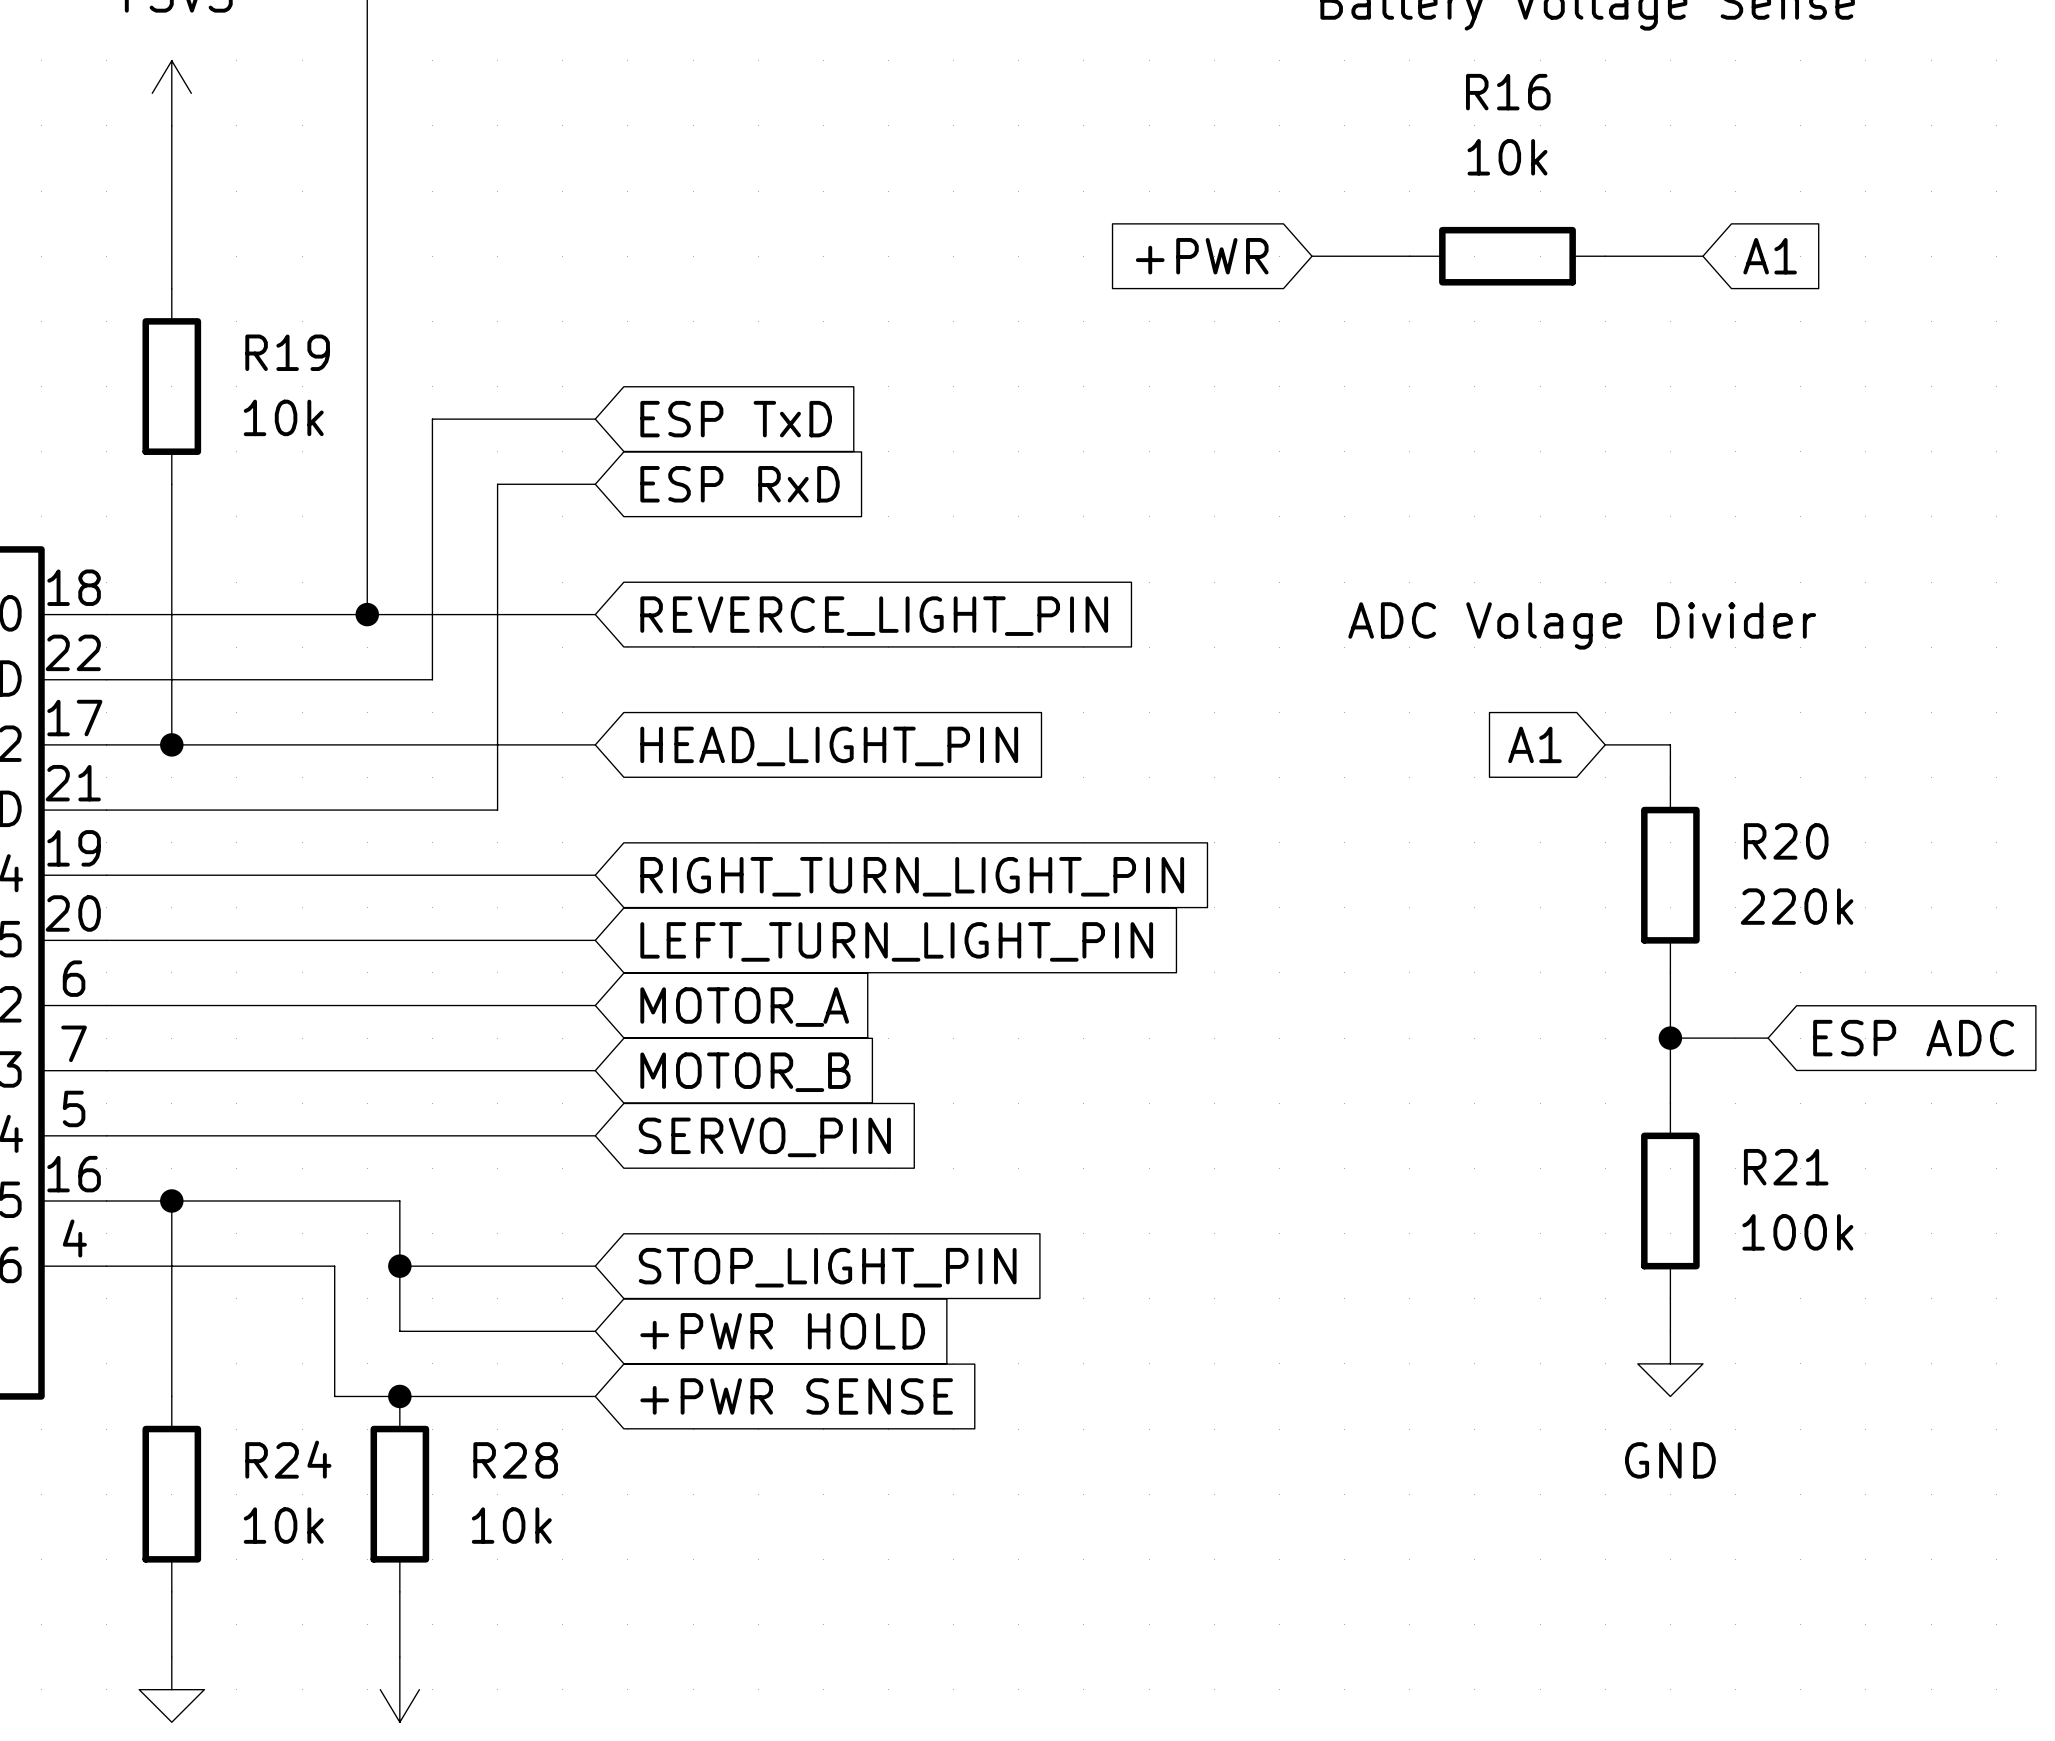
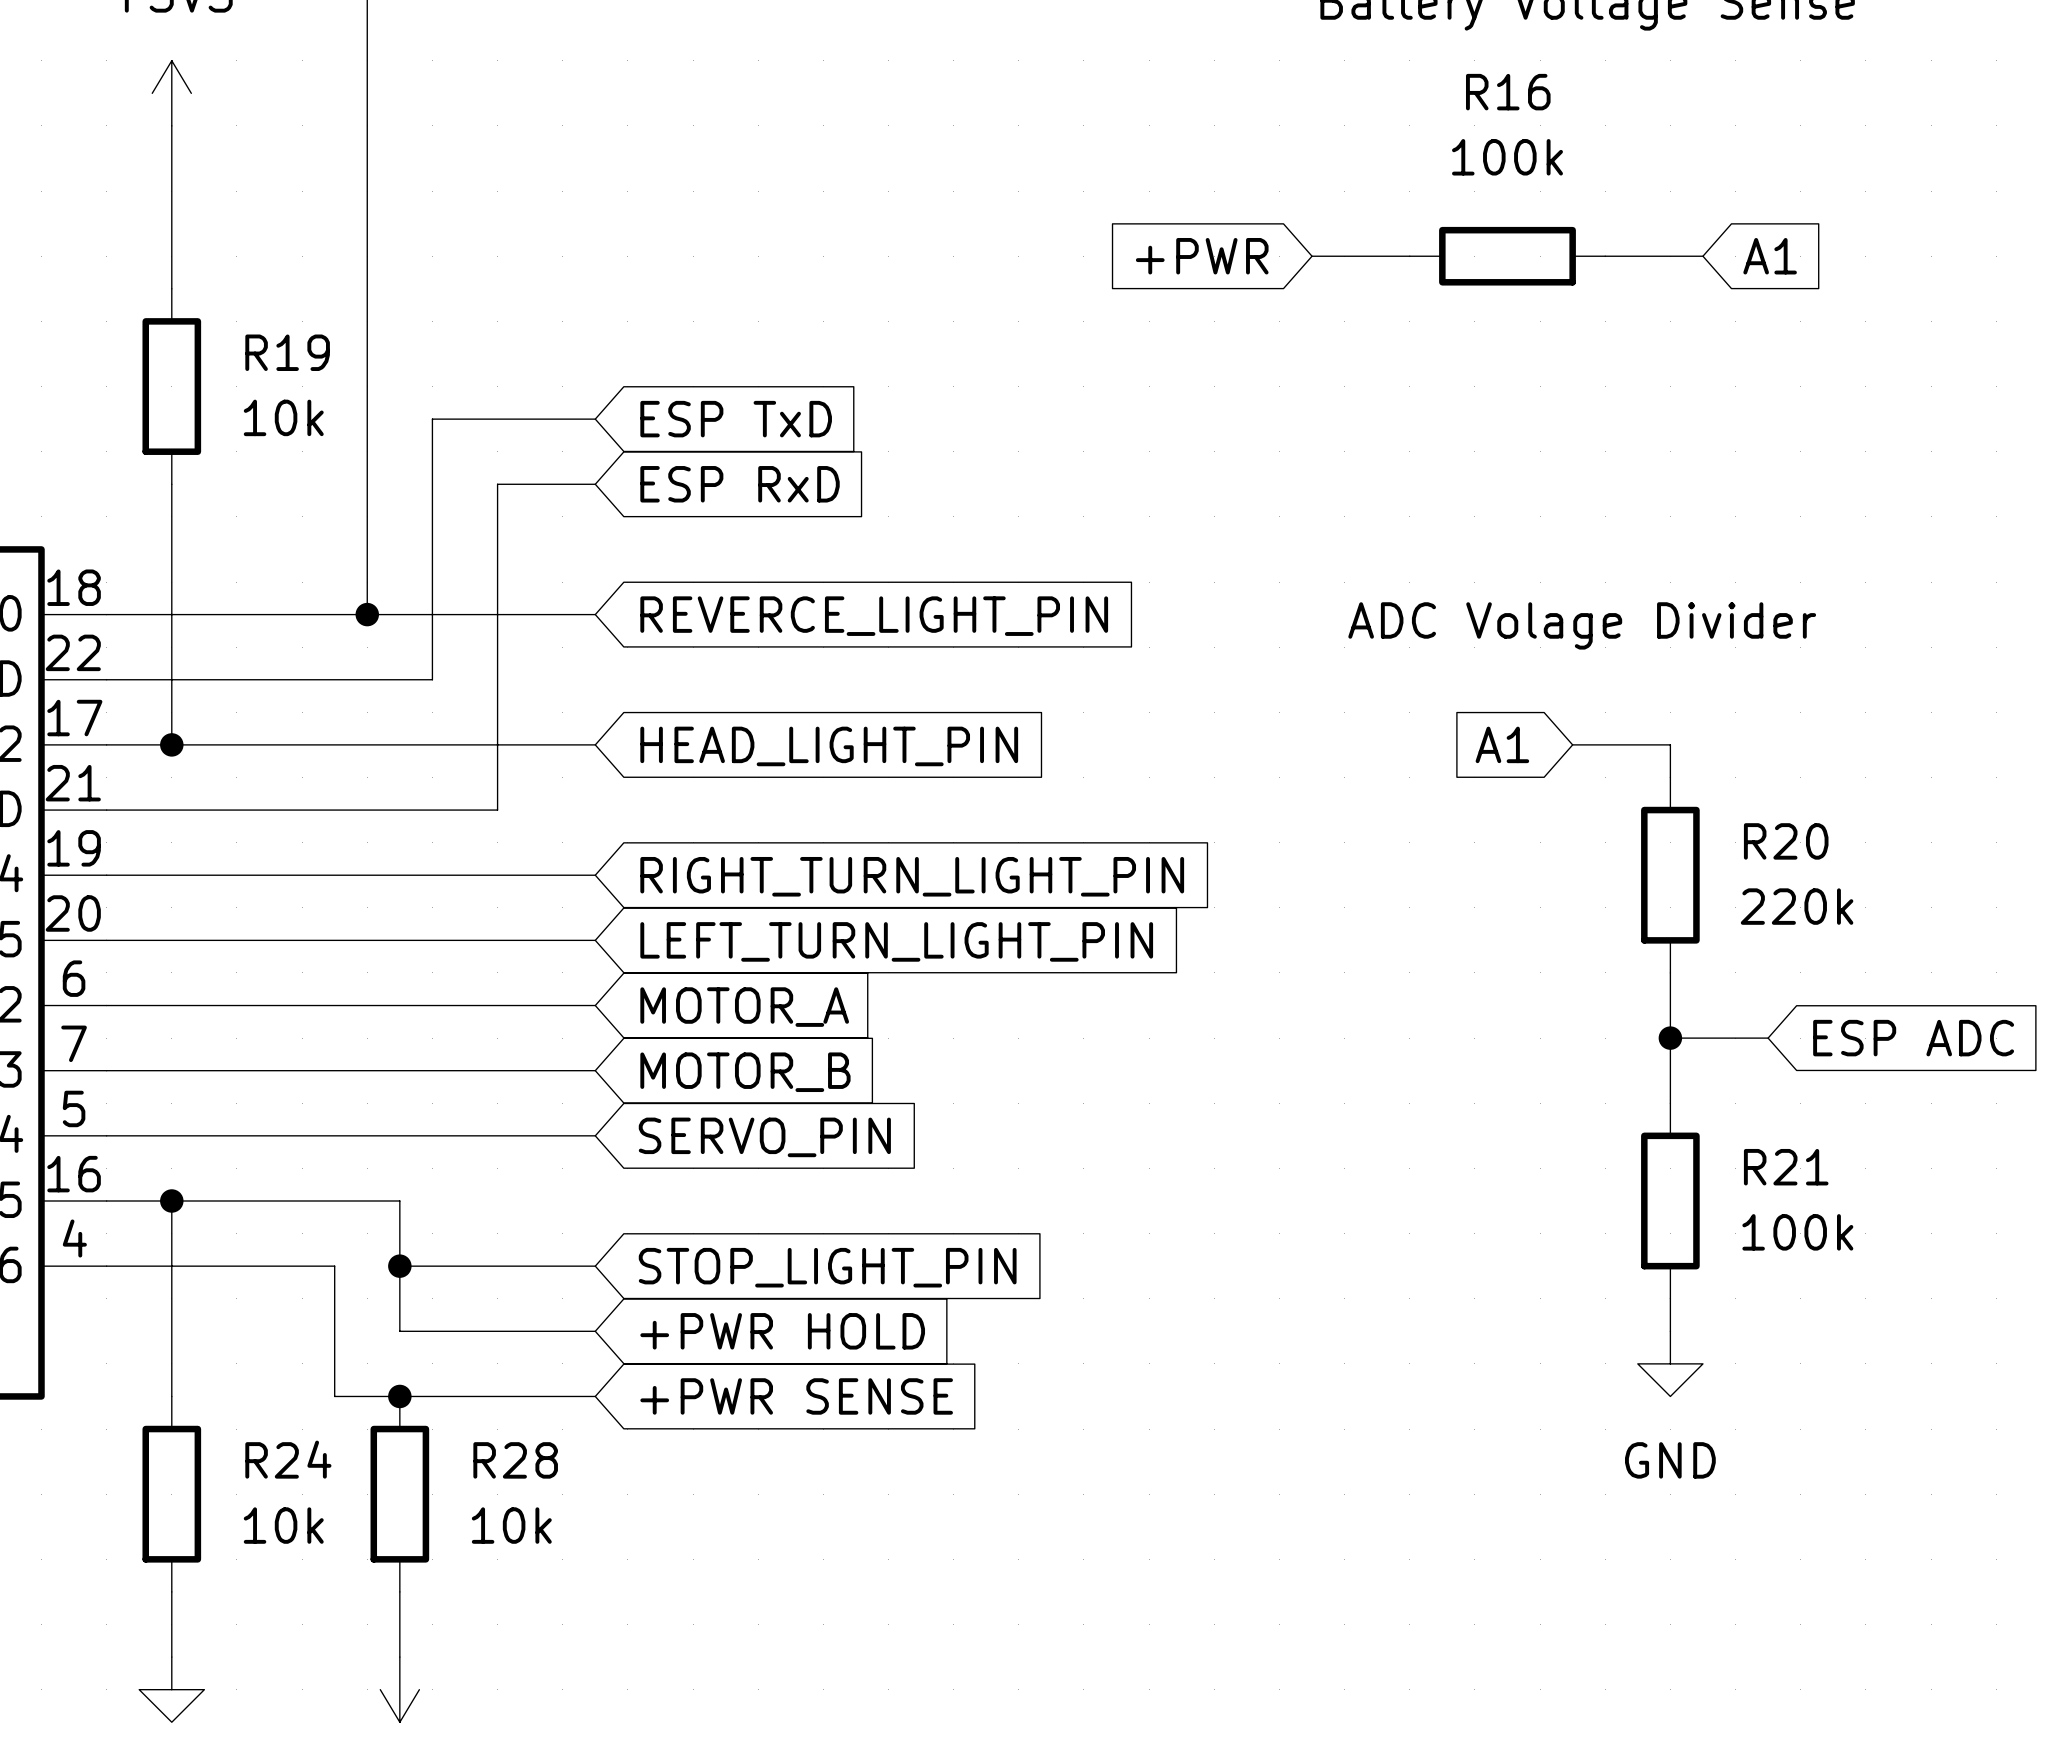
R16 value: 10k (1507, 157) -> 100k (1507, 157)
global label position: A1 (1534, 744) -> A1 (1502, 744)
wire: none -> (1572, 744) (1605, 744)

